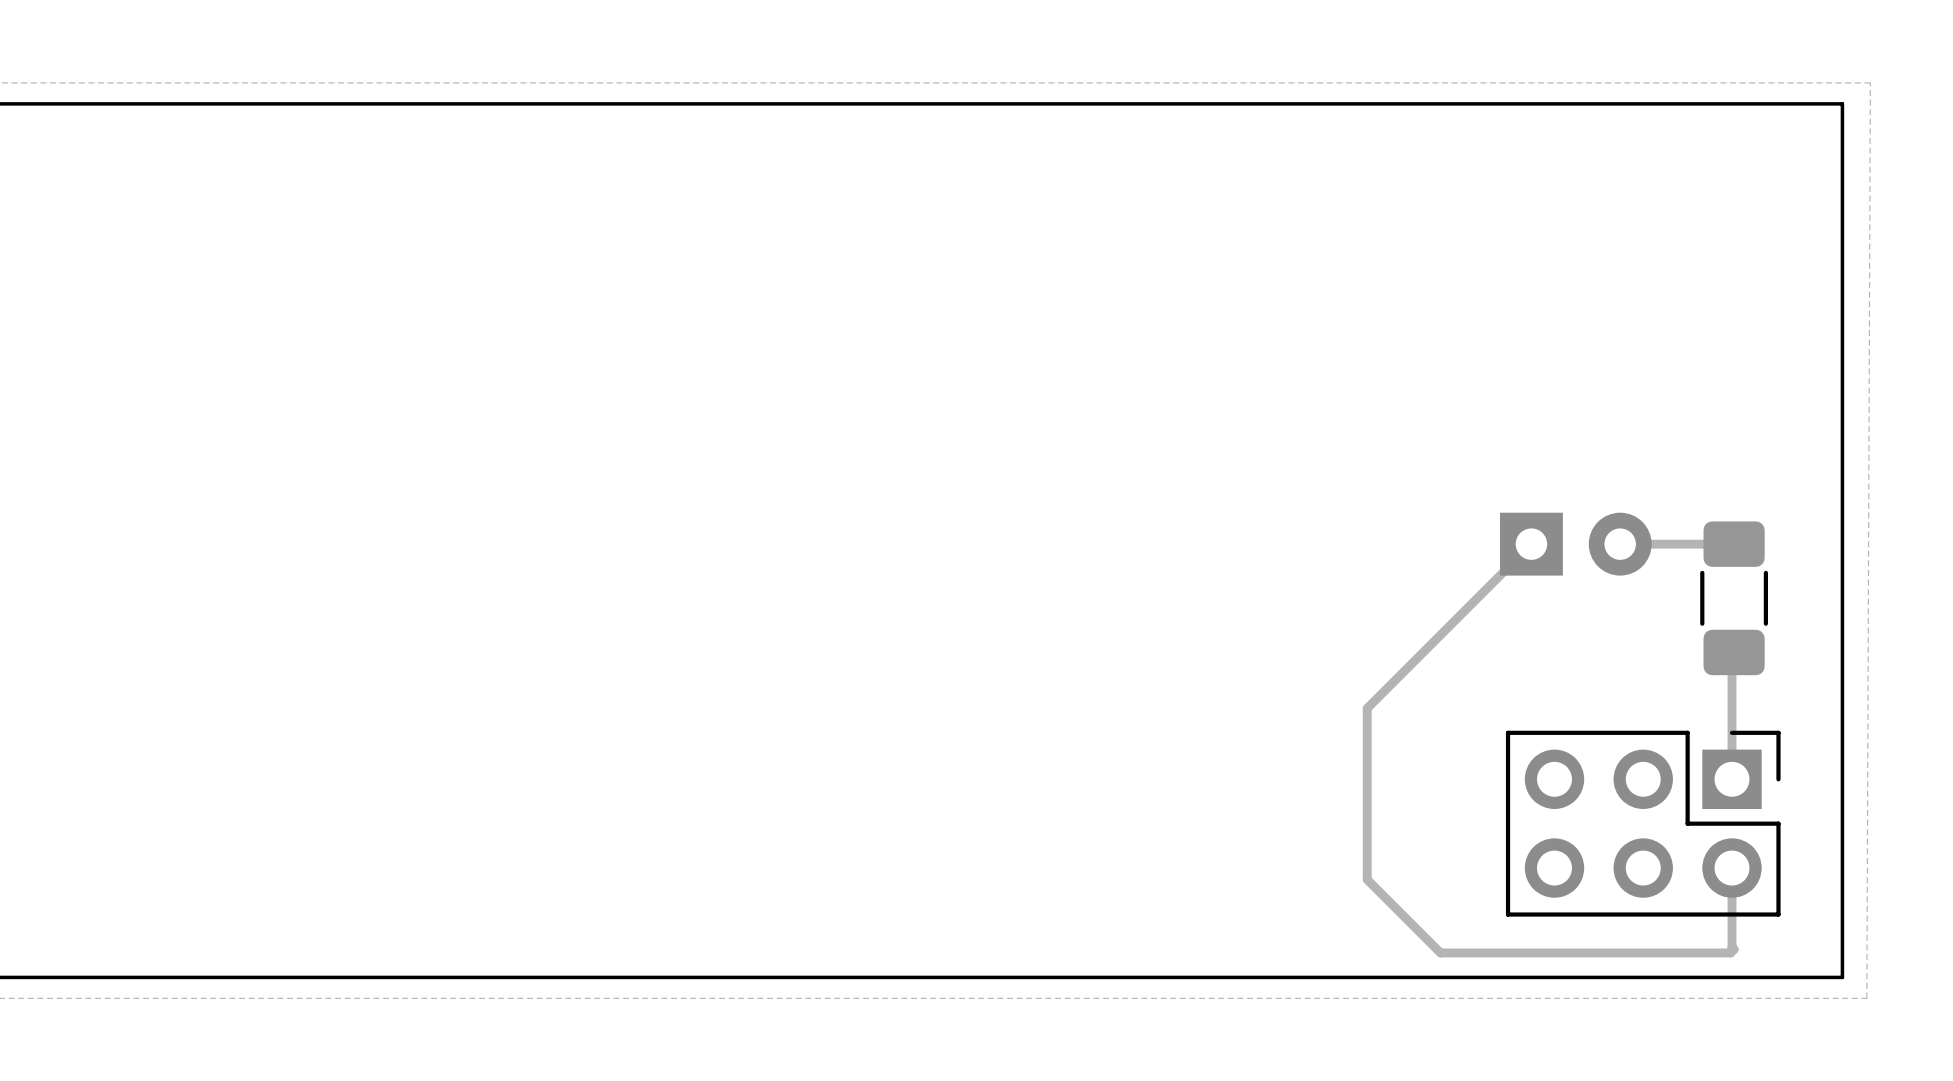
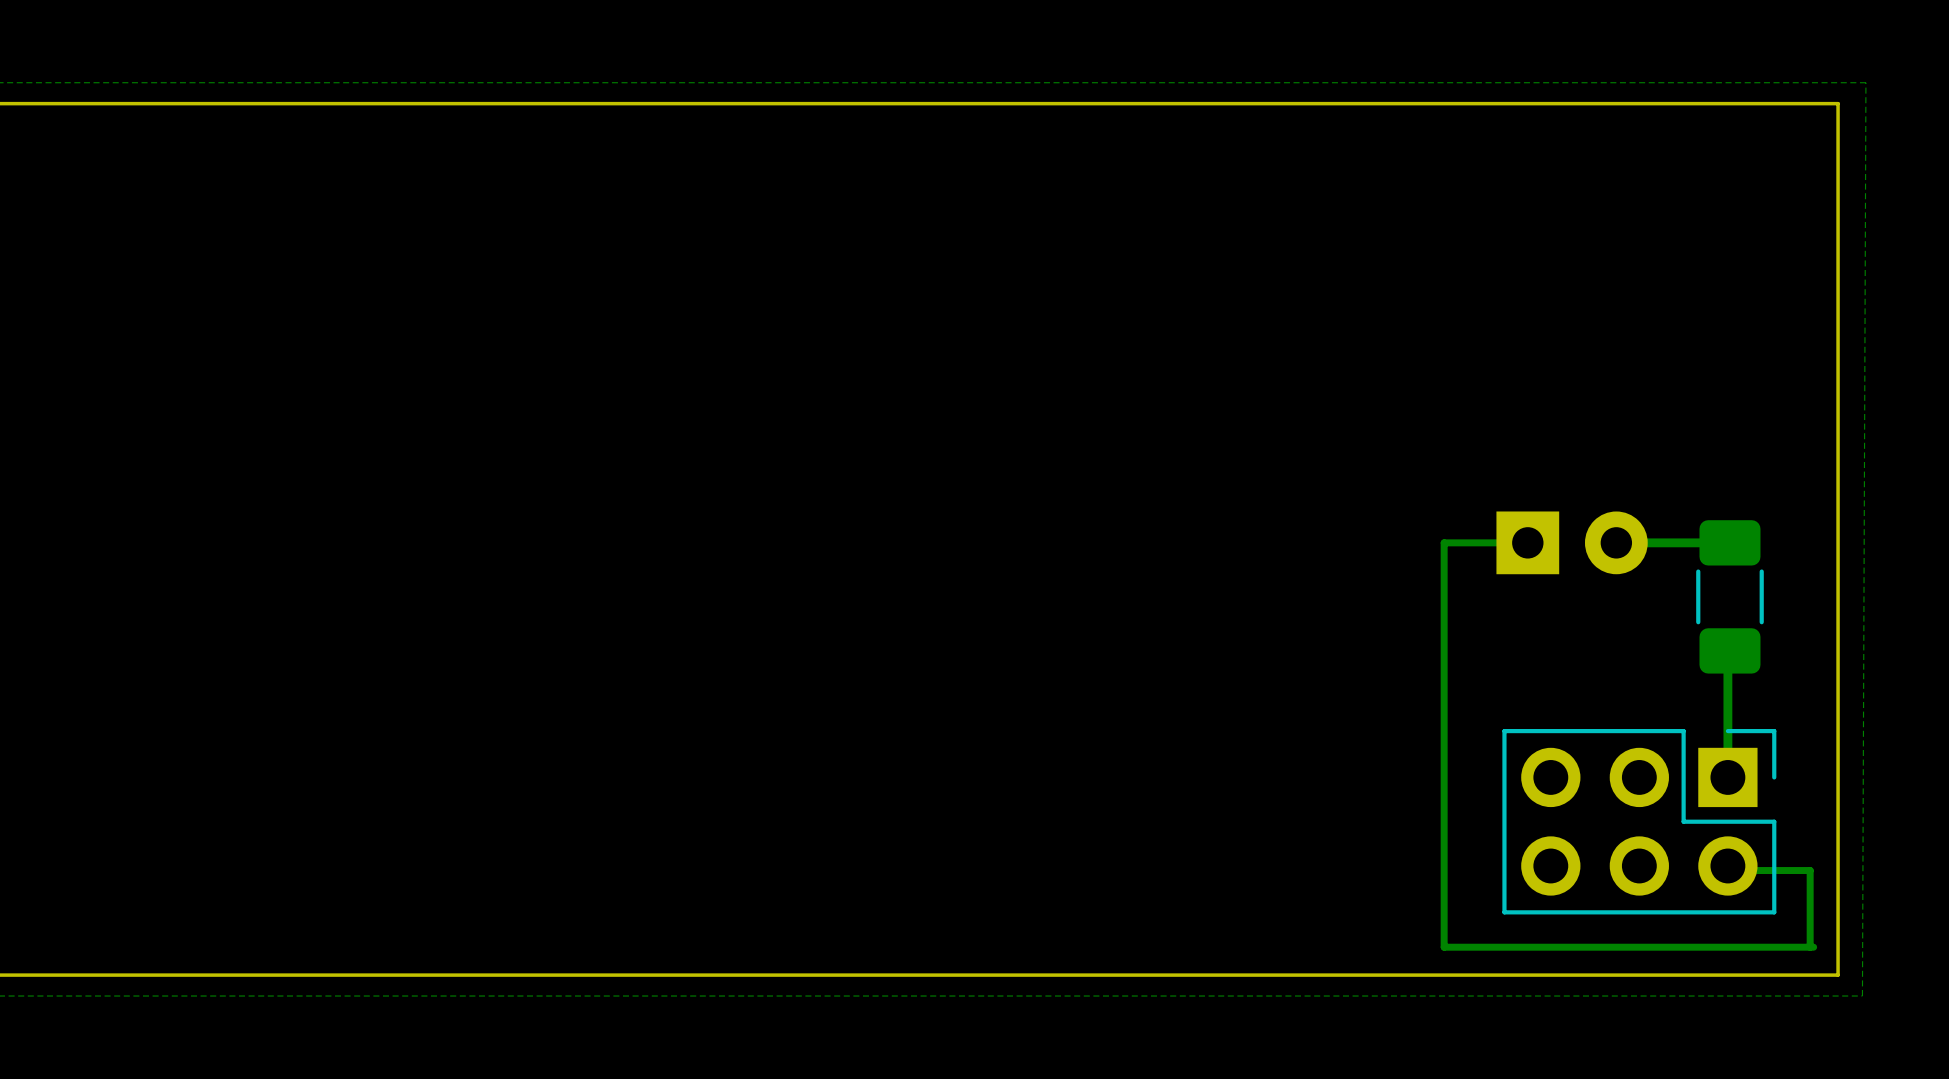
track: (1531, 544) (1367, 708) (1367, 879) (1440, 952) (1730, 952) (1734, 949) (1732, 947) (1732, 868) -> (1527, 542) (1444, 542) (1444, 947) (1813, 947)
track: none -> (1729, 870) (1810, 870) (1810, 947)

